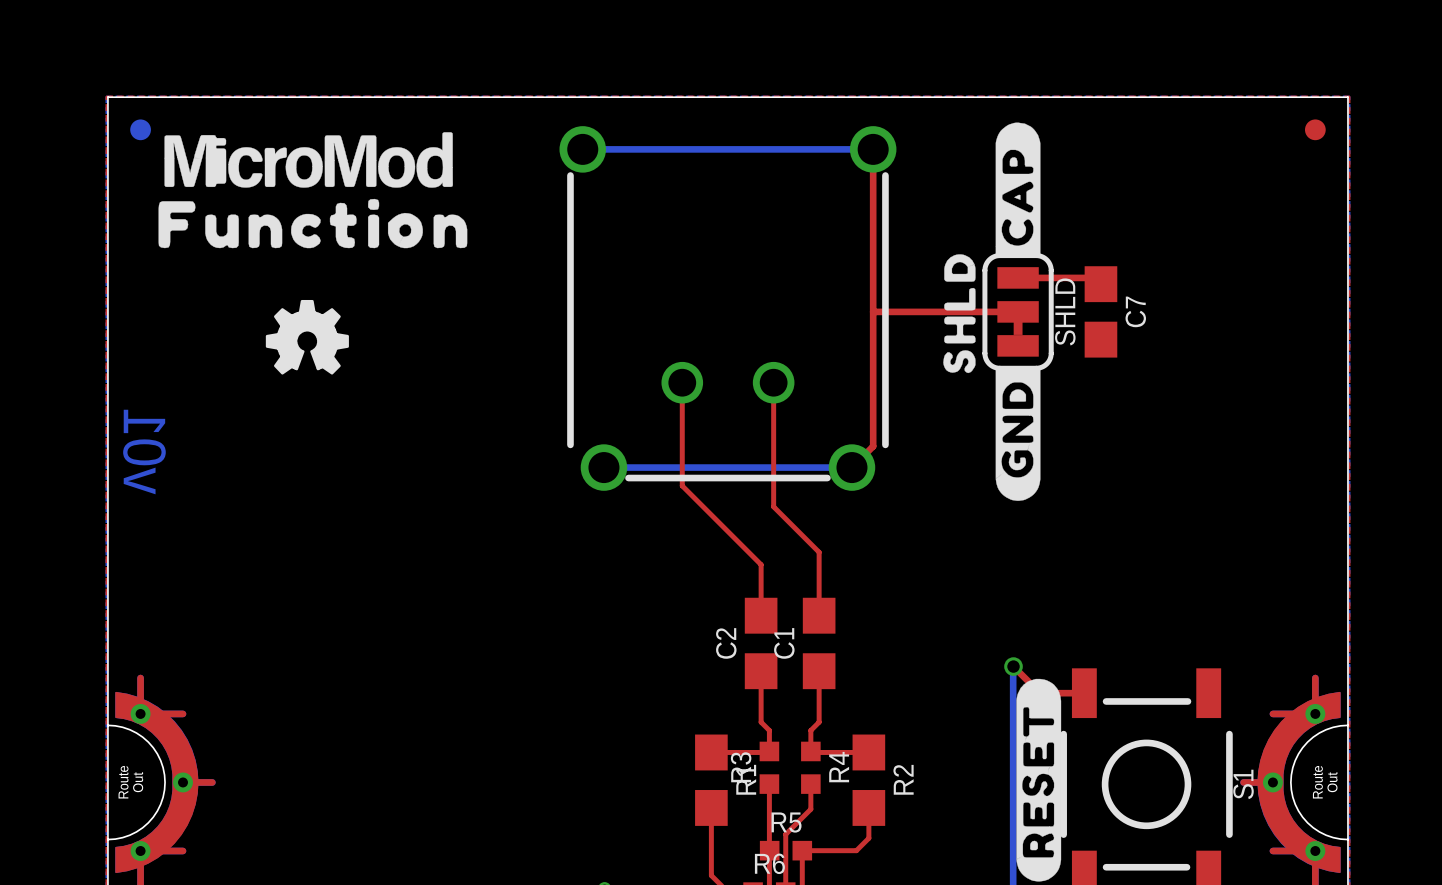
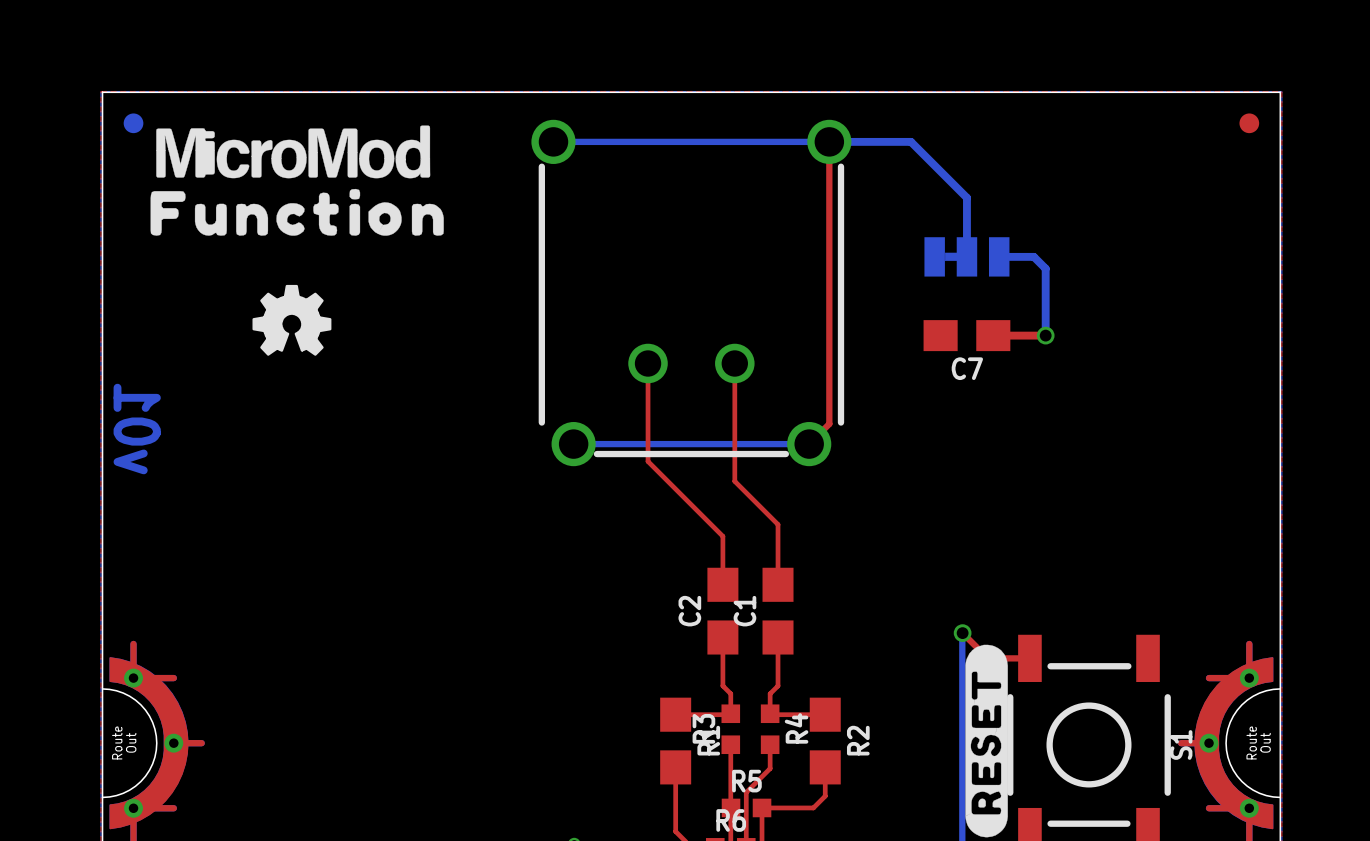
drawing: [943, 122, 1041, 501] -> none
bottom track: none -> (829, 141) (911, 141) (966, 197) (966, 256)
bottom track: none -> (999, 256) (1033, 256) (1045, 268) (1045, 335)
top track: (1018, 277) (1094, 277) (1100, 284) -> none
top track: (873, 311) (1018, 311) -> none
SHLD side: top (1018, 311) -> bottom (966, 256)
C7 rotation: 0° (1100, 311) -> 90° clockwise (966, 335)
C7 position: (1100, 311) -> (966, 335)
top track: none -> (993, 335) (1045, 335)
via: none -> (1045, 335)

